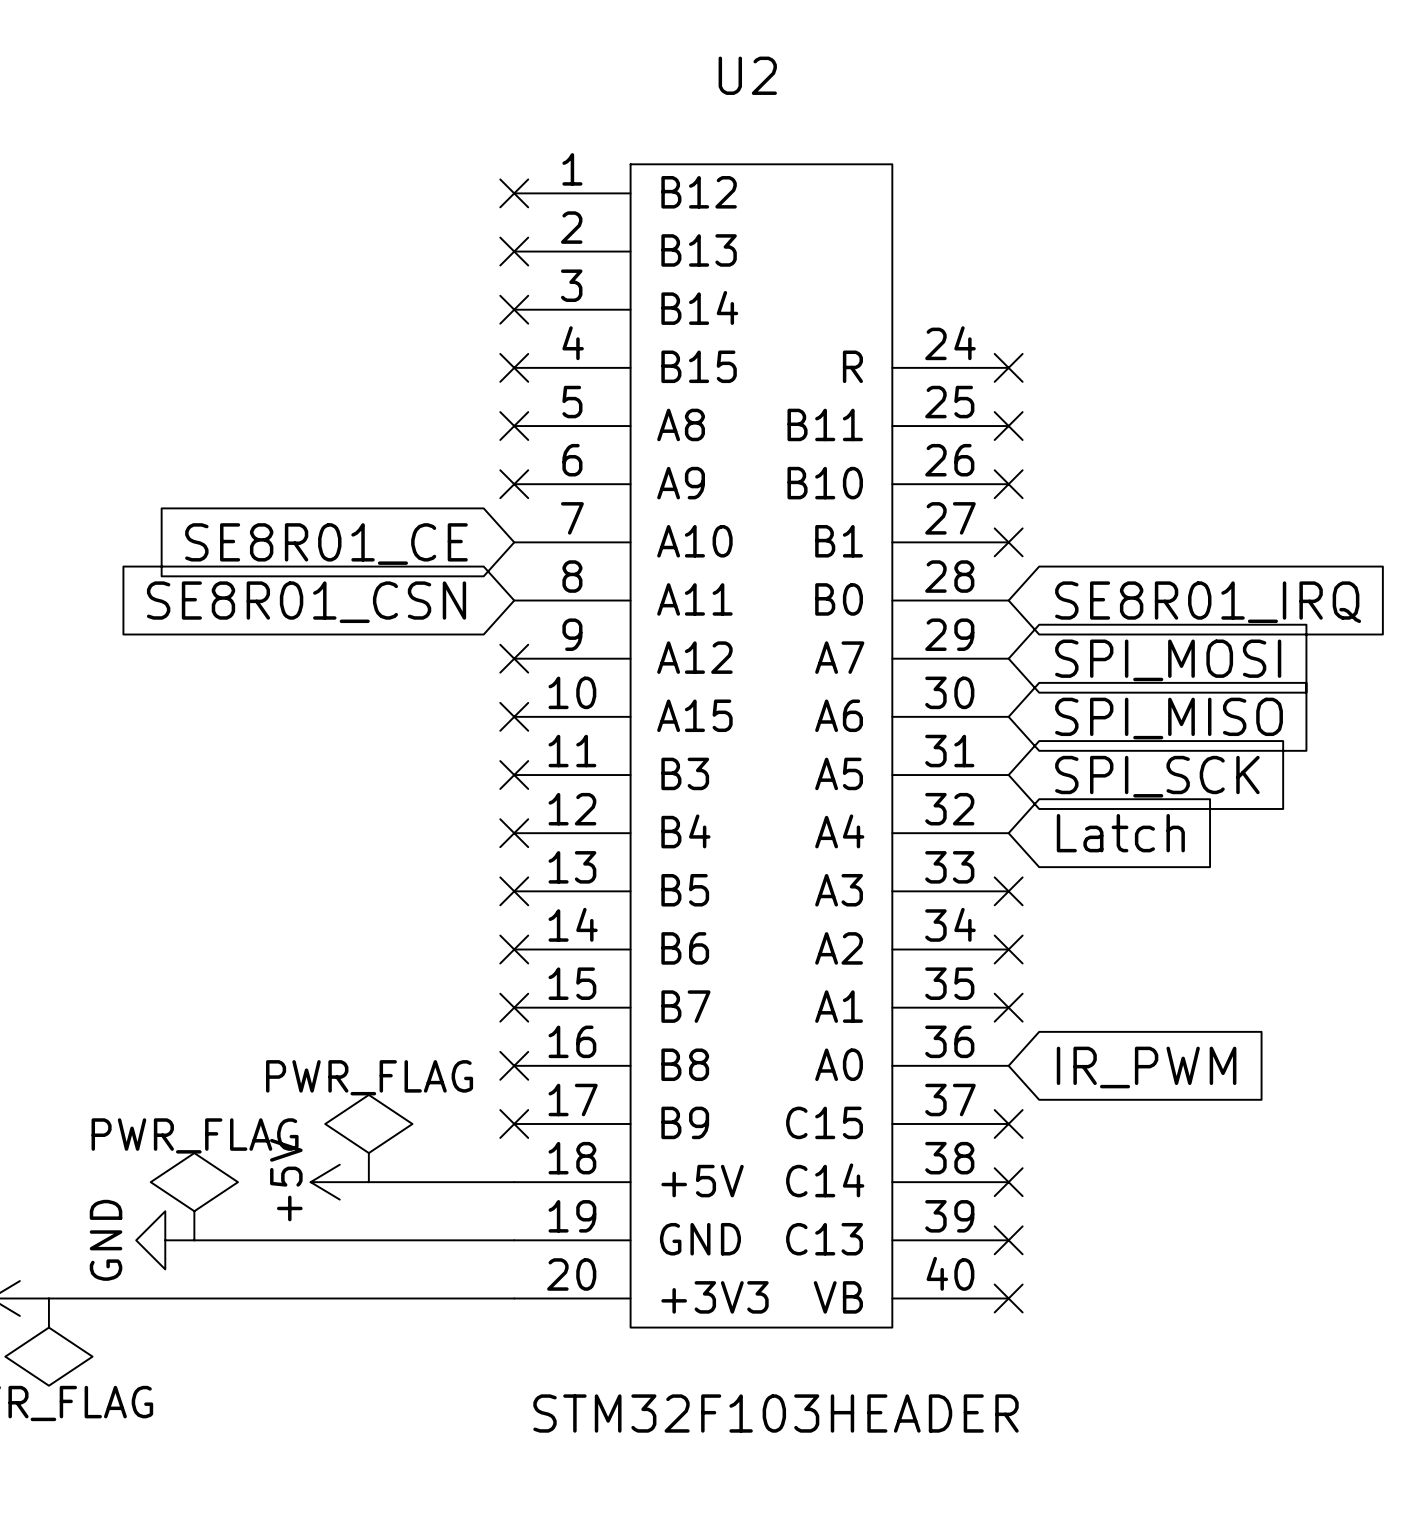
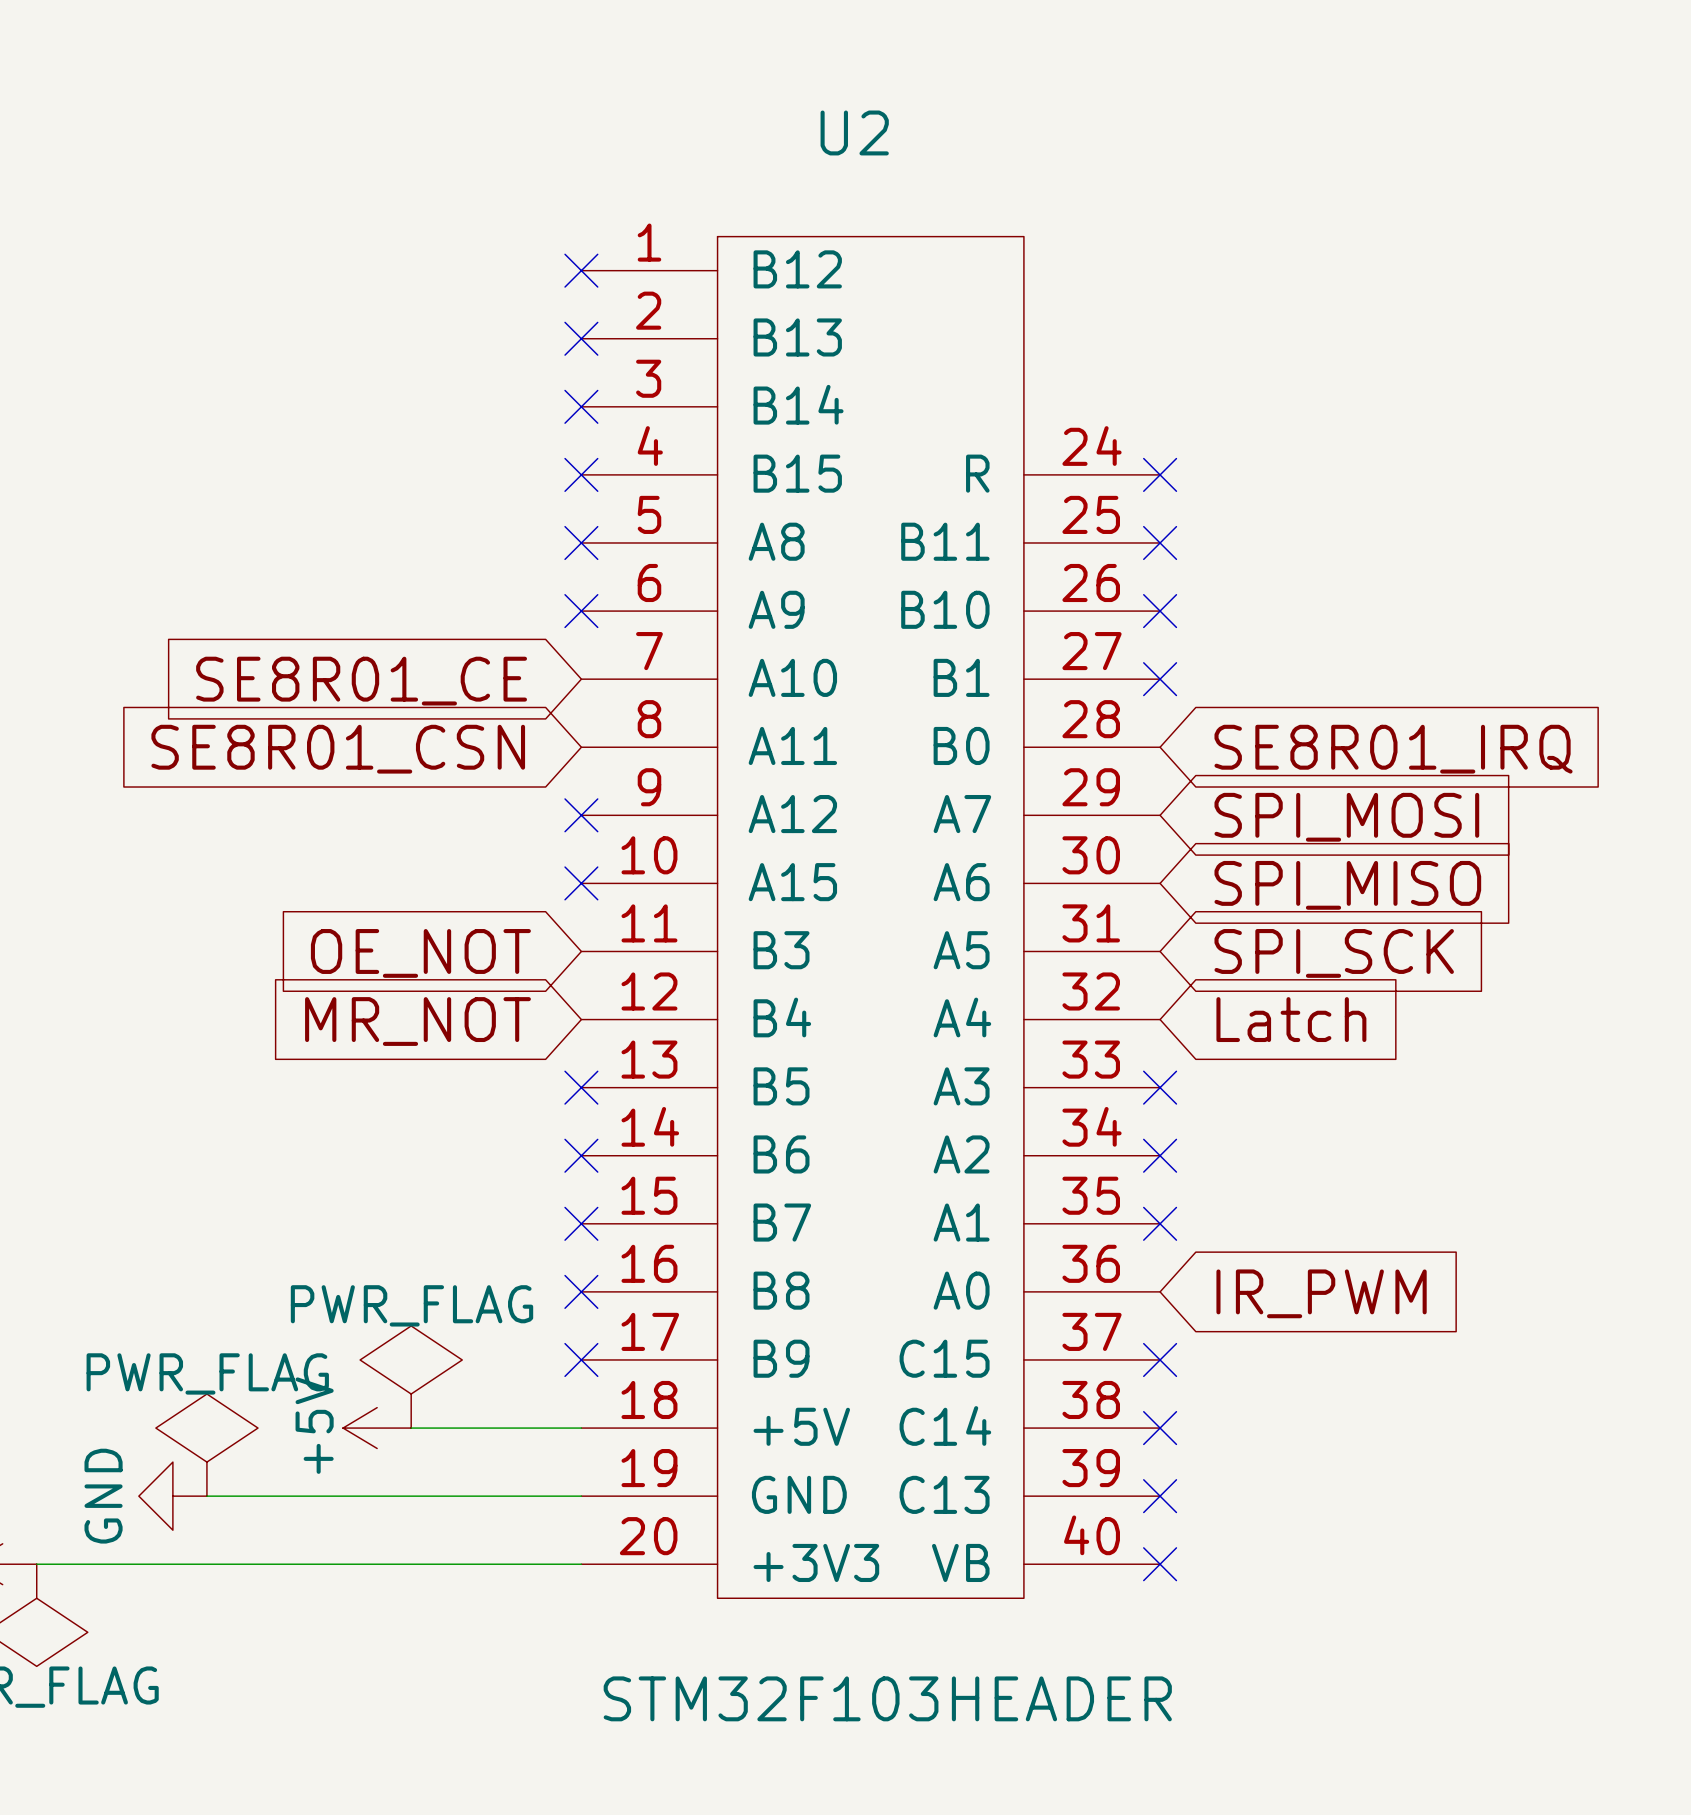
no-connect mark: (514, 775) -> none
global label: none -> OE_NOT (420, 953)
no-connect mark: (514, 833) -> none
global label: none -> MR_NOT (417, 1021)

